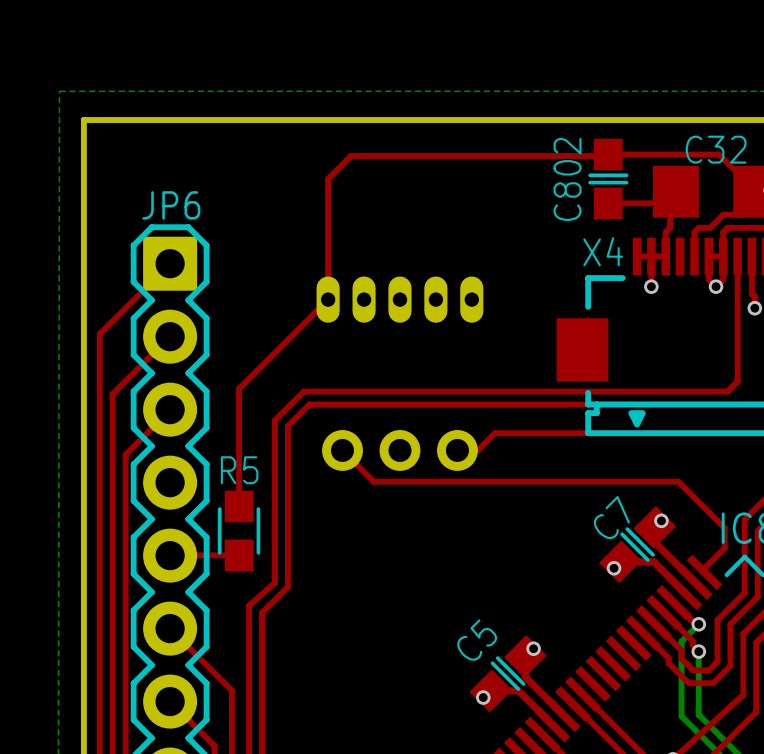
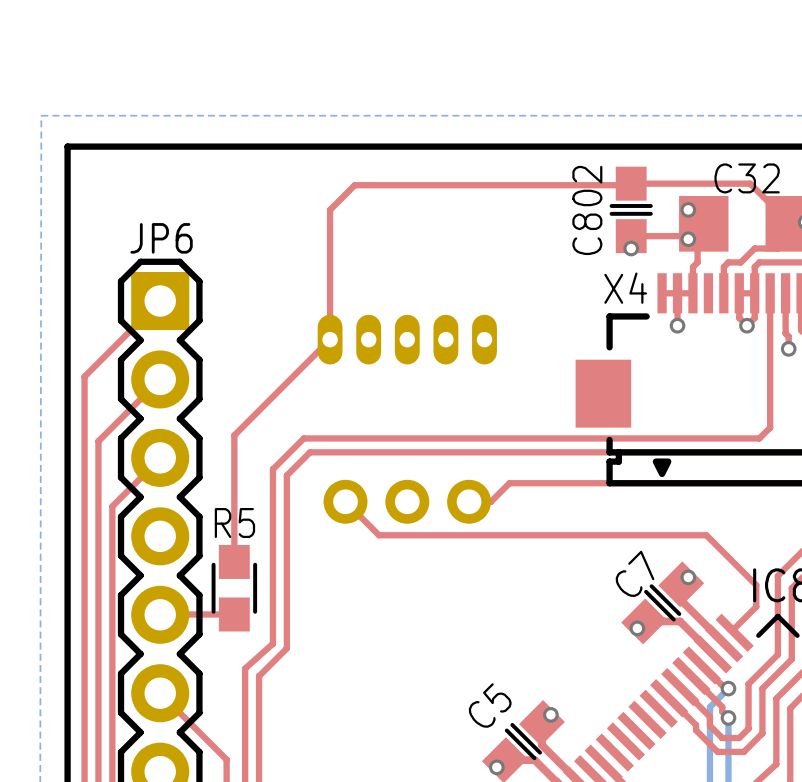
via: none -> (688, 209)
via: none -> (688, 239)
via: none -> (631, 248)

